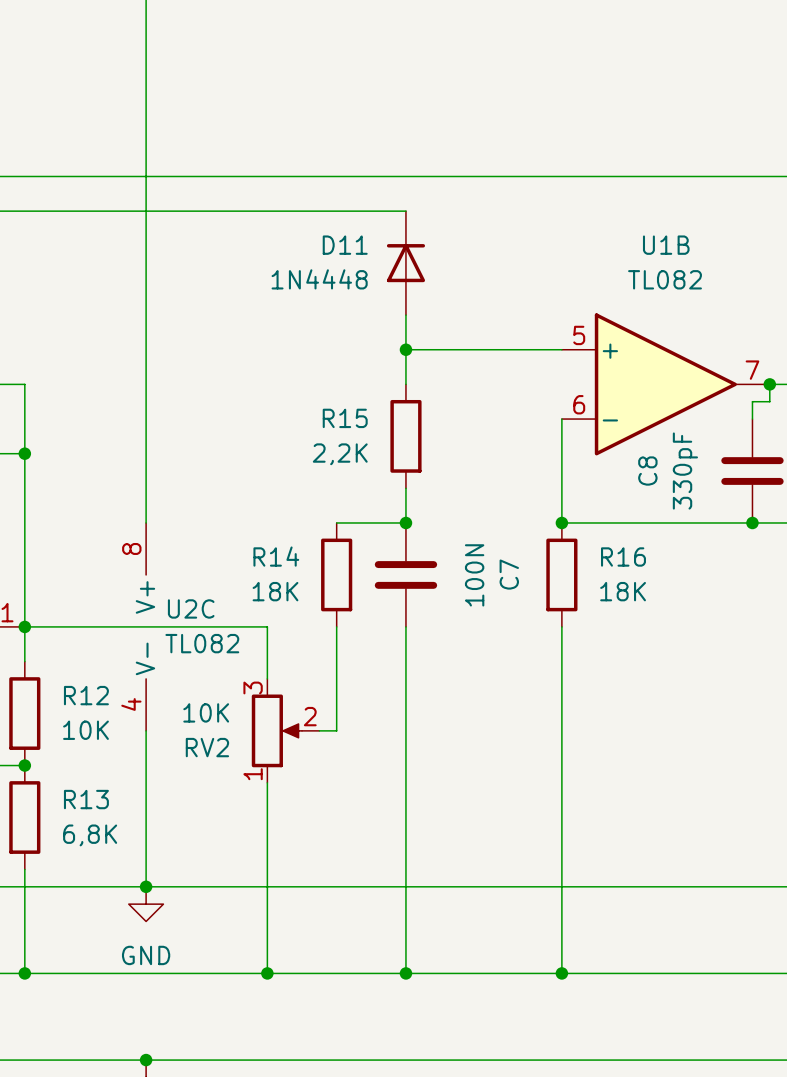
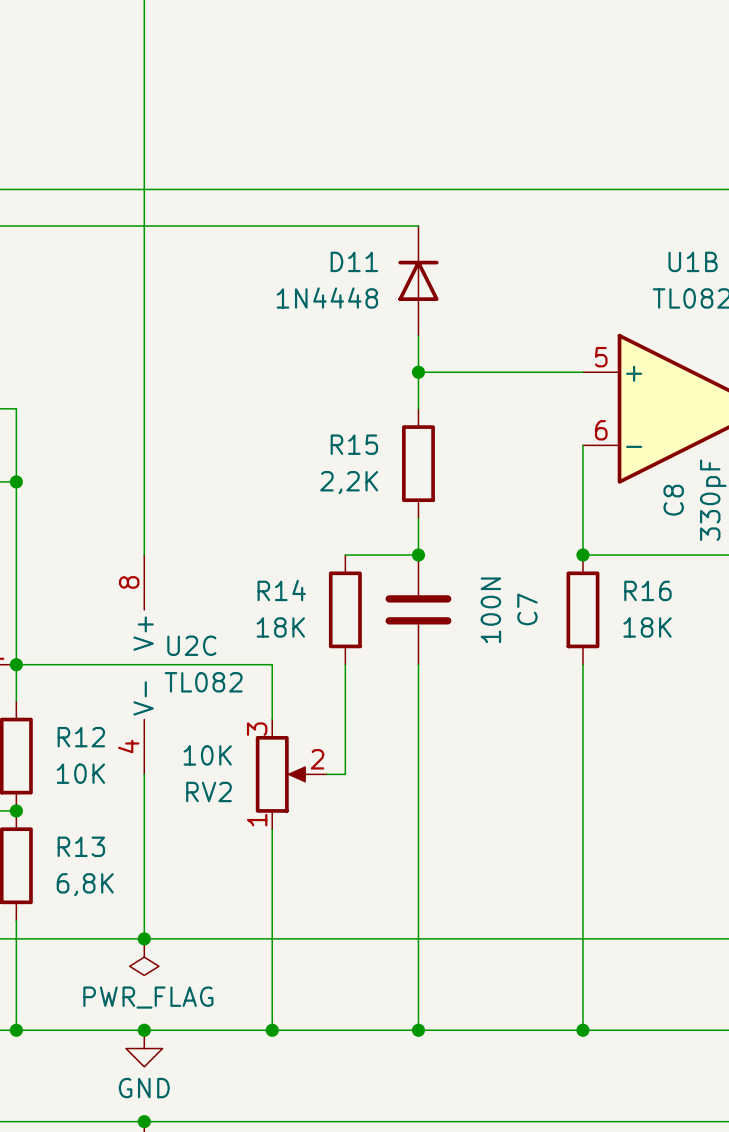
power symbol: GND (146, 904) -> PWR_FLAG (144, 957)
junction: none -> (144, 1030)
power symbol: none -> GND (144, 1048)

